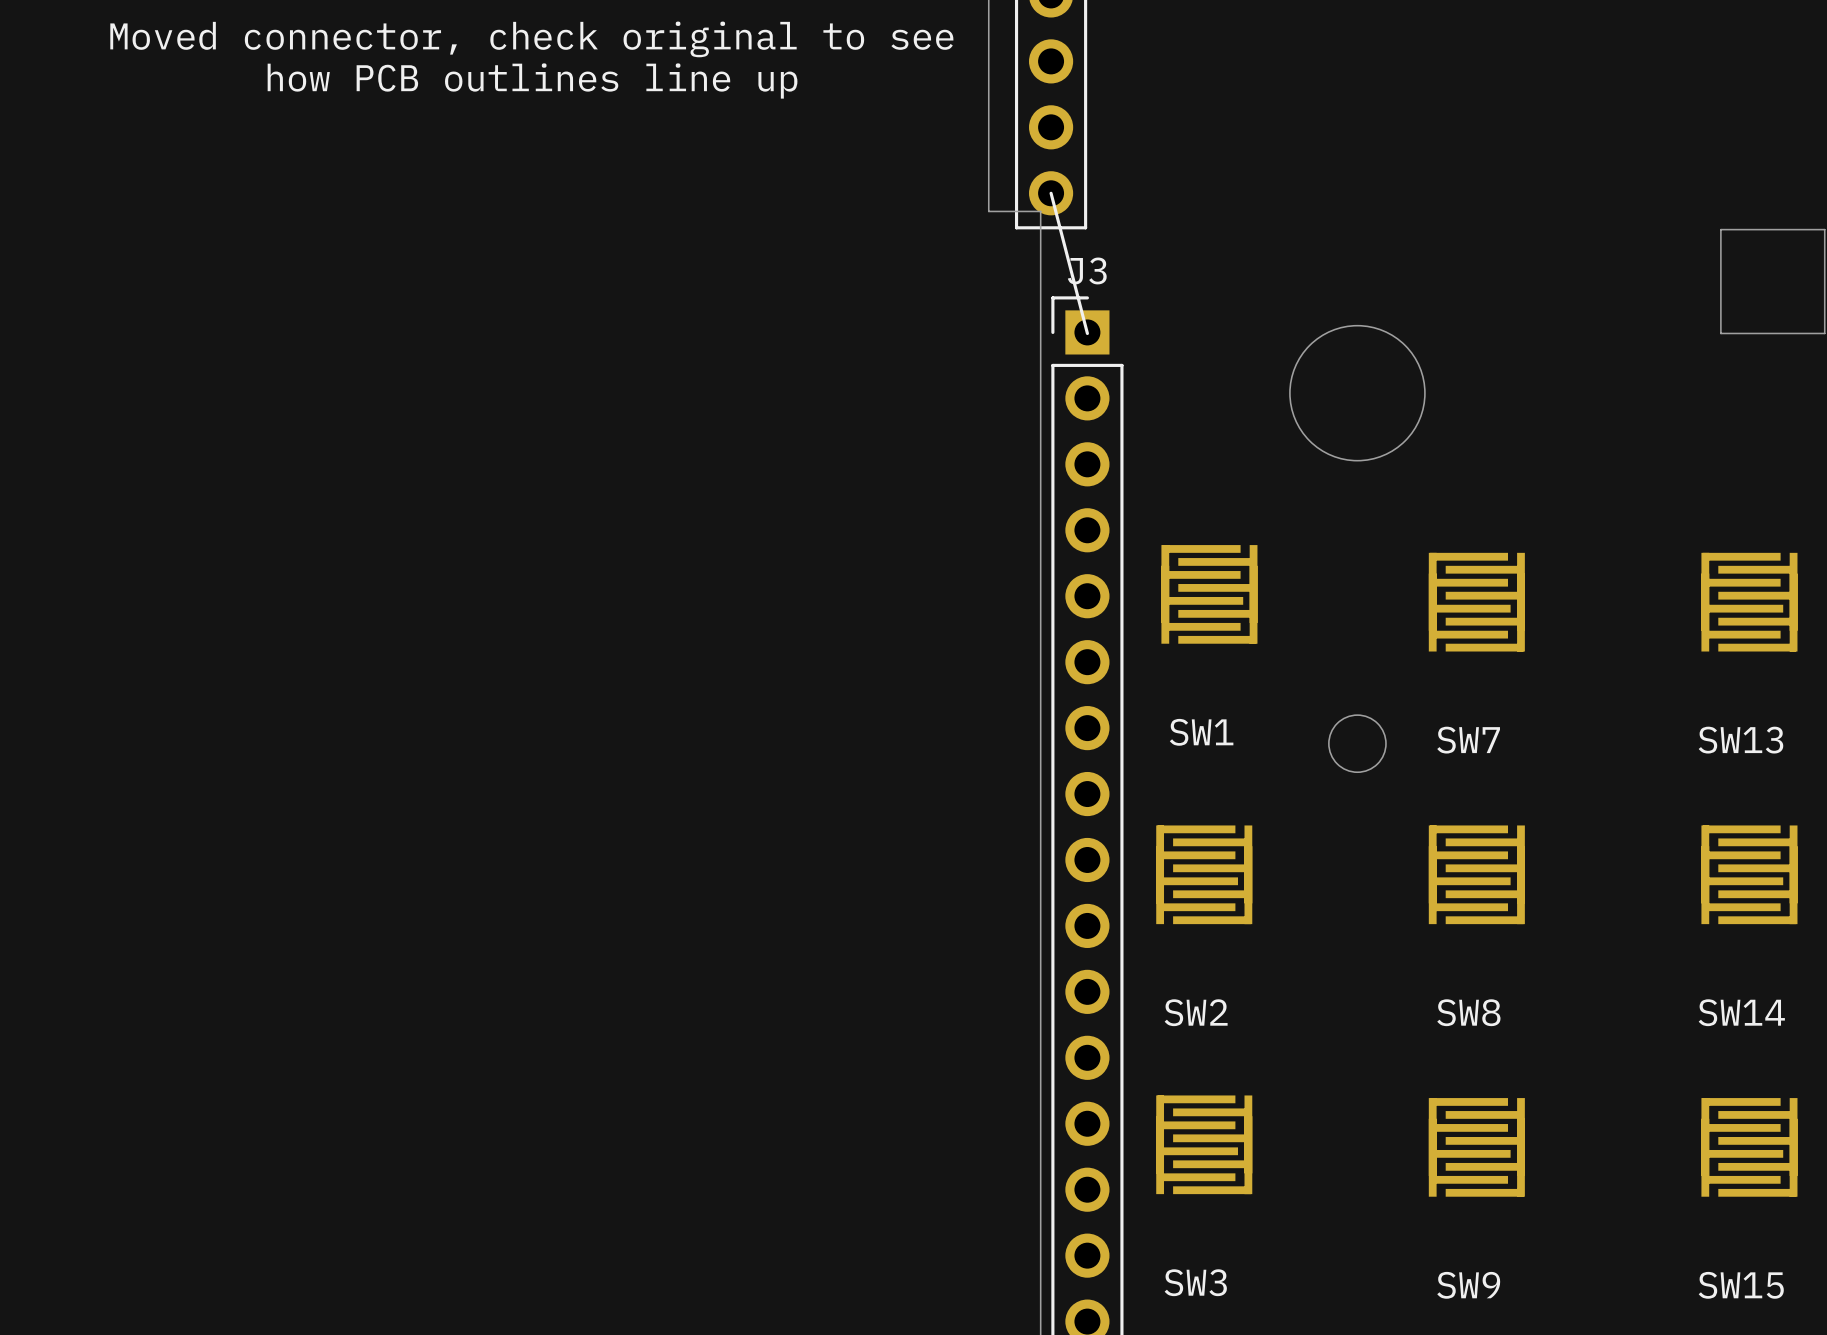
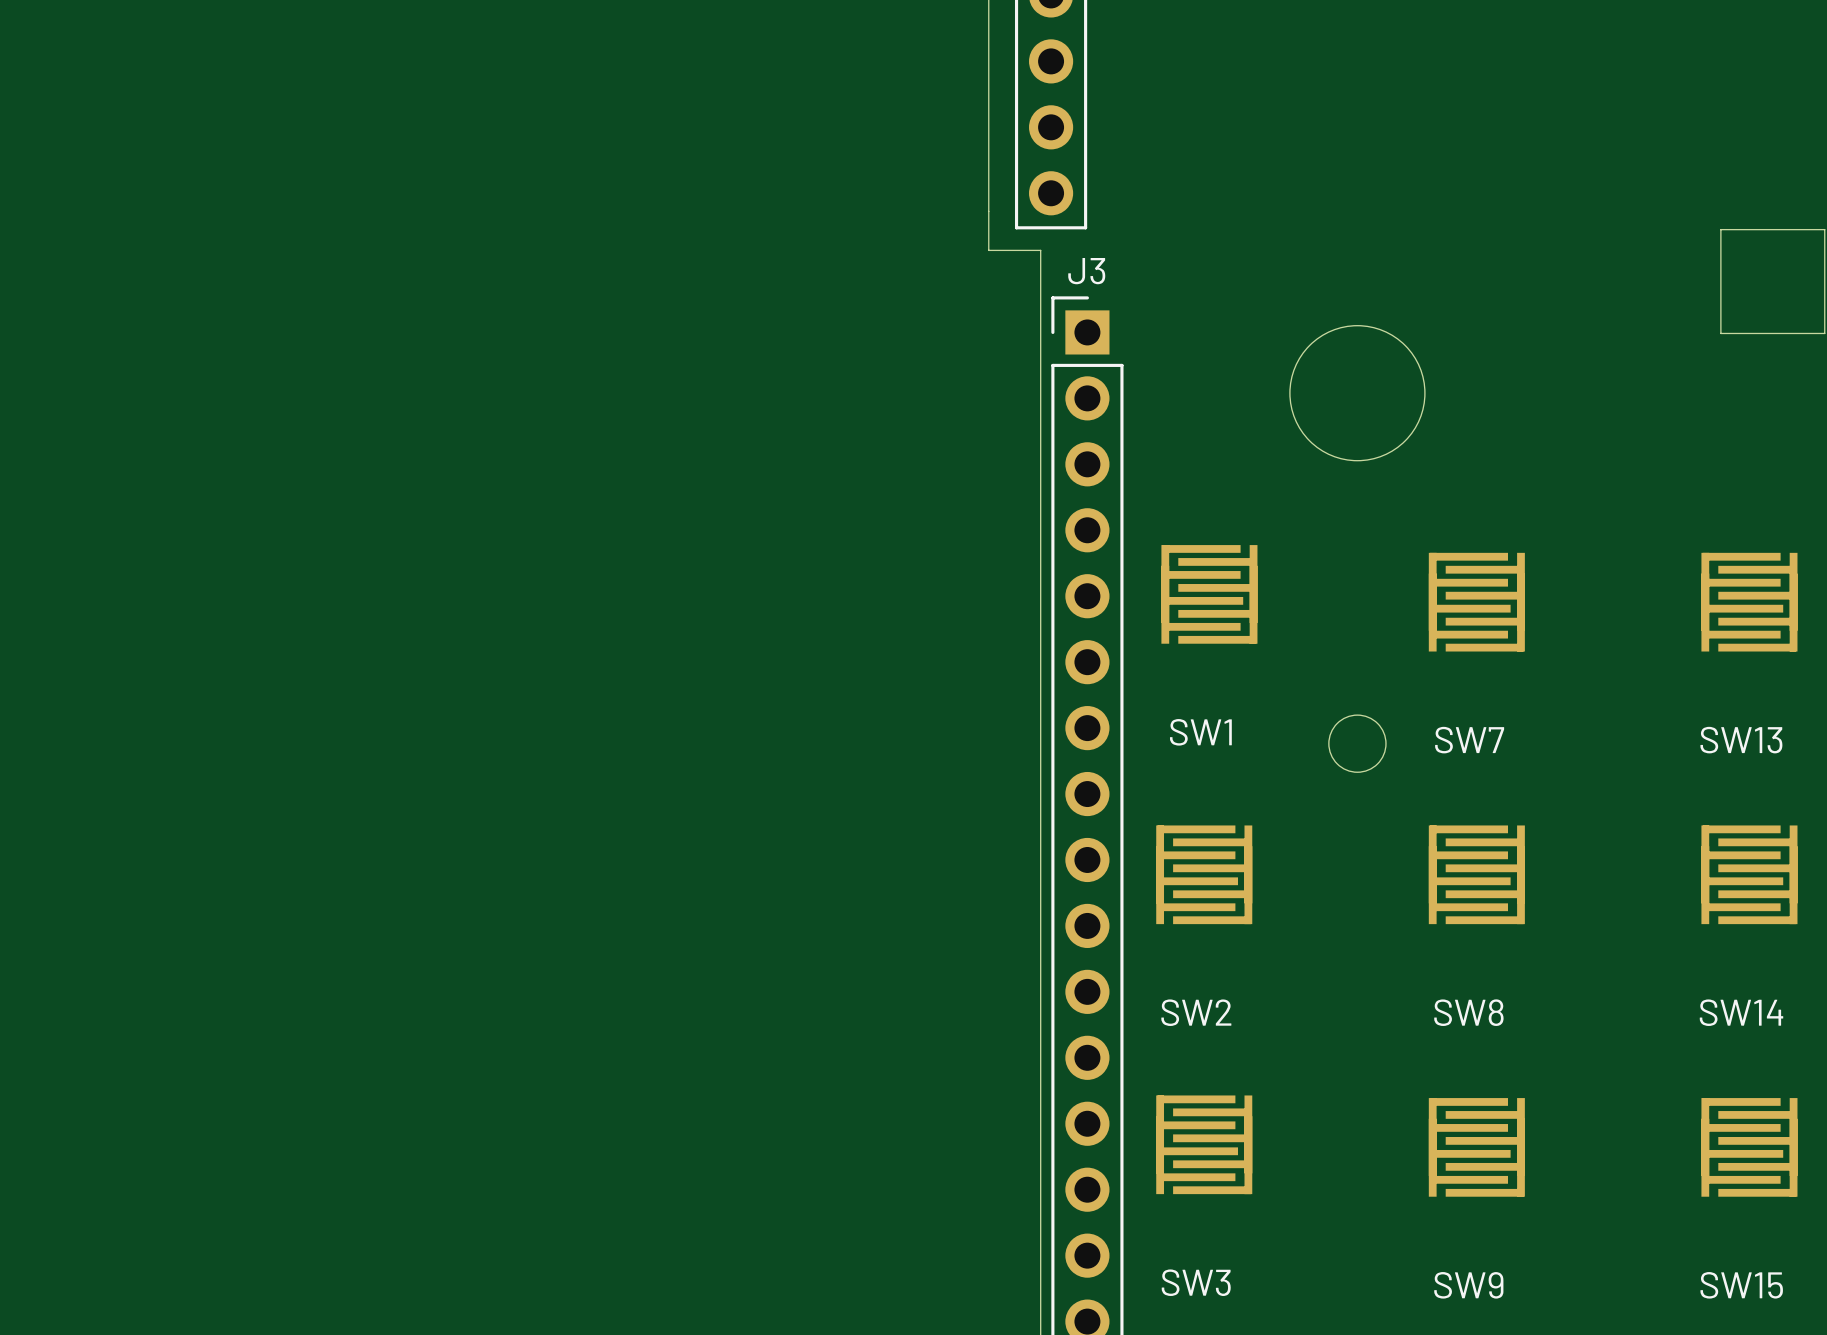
text: Moved connector, check original to see (531, 39) -> none
text: how PCB outlines line up (532, 80) -> none
line: (1051, 193) (1087, 333) -> none
board edge: (988, 211) (1040, 211) (1040, 250) -> (988, 211) (988, 250) (1040, 250)

